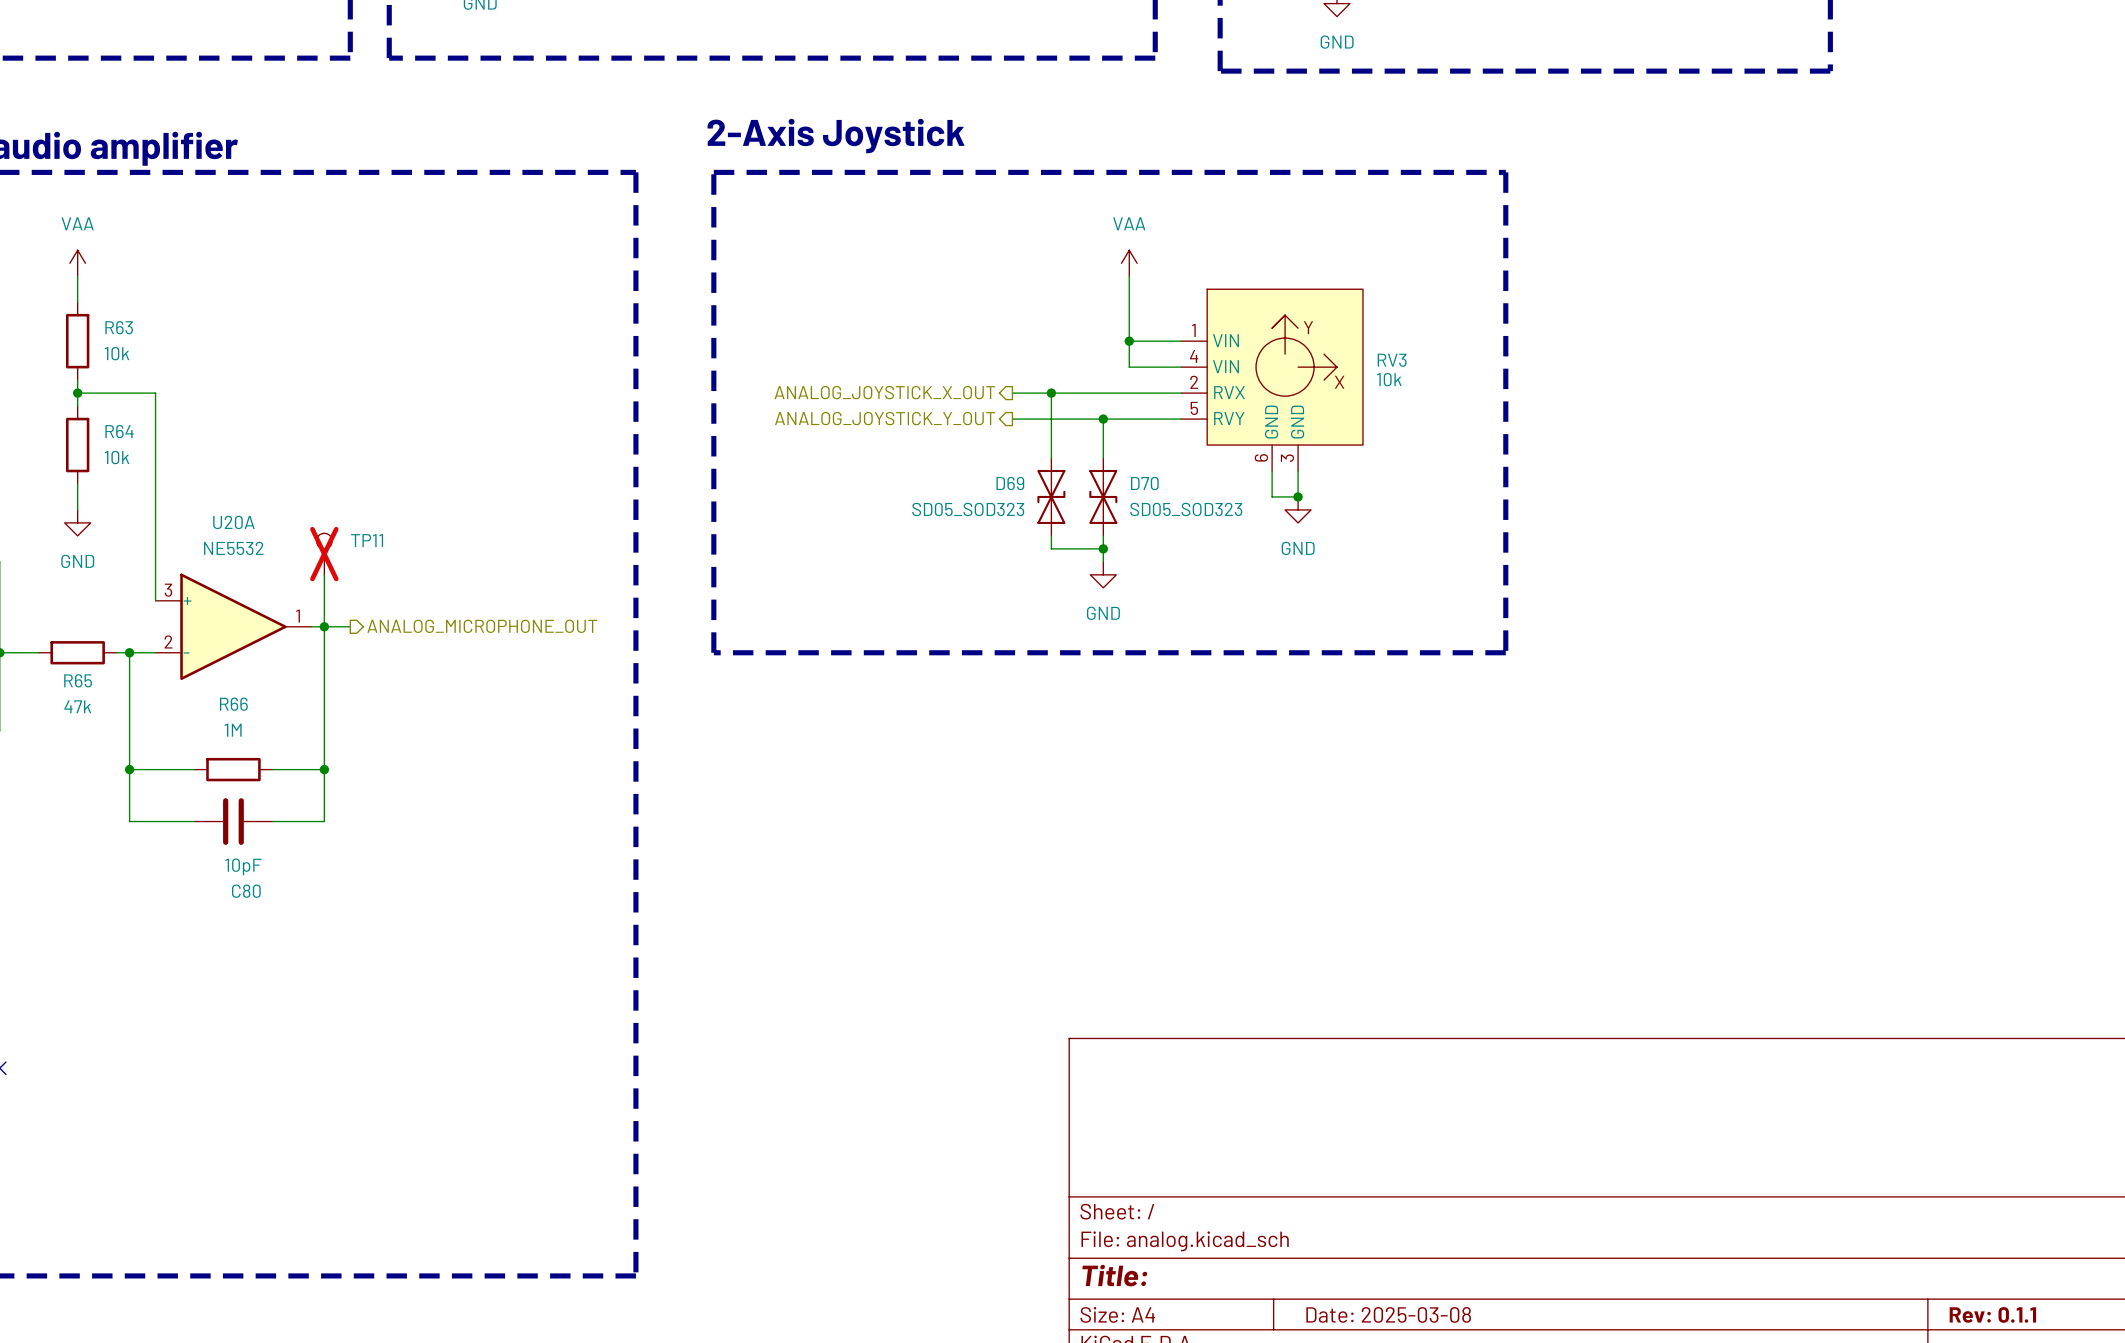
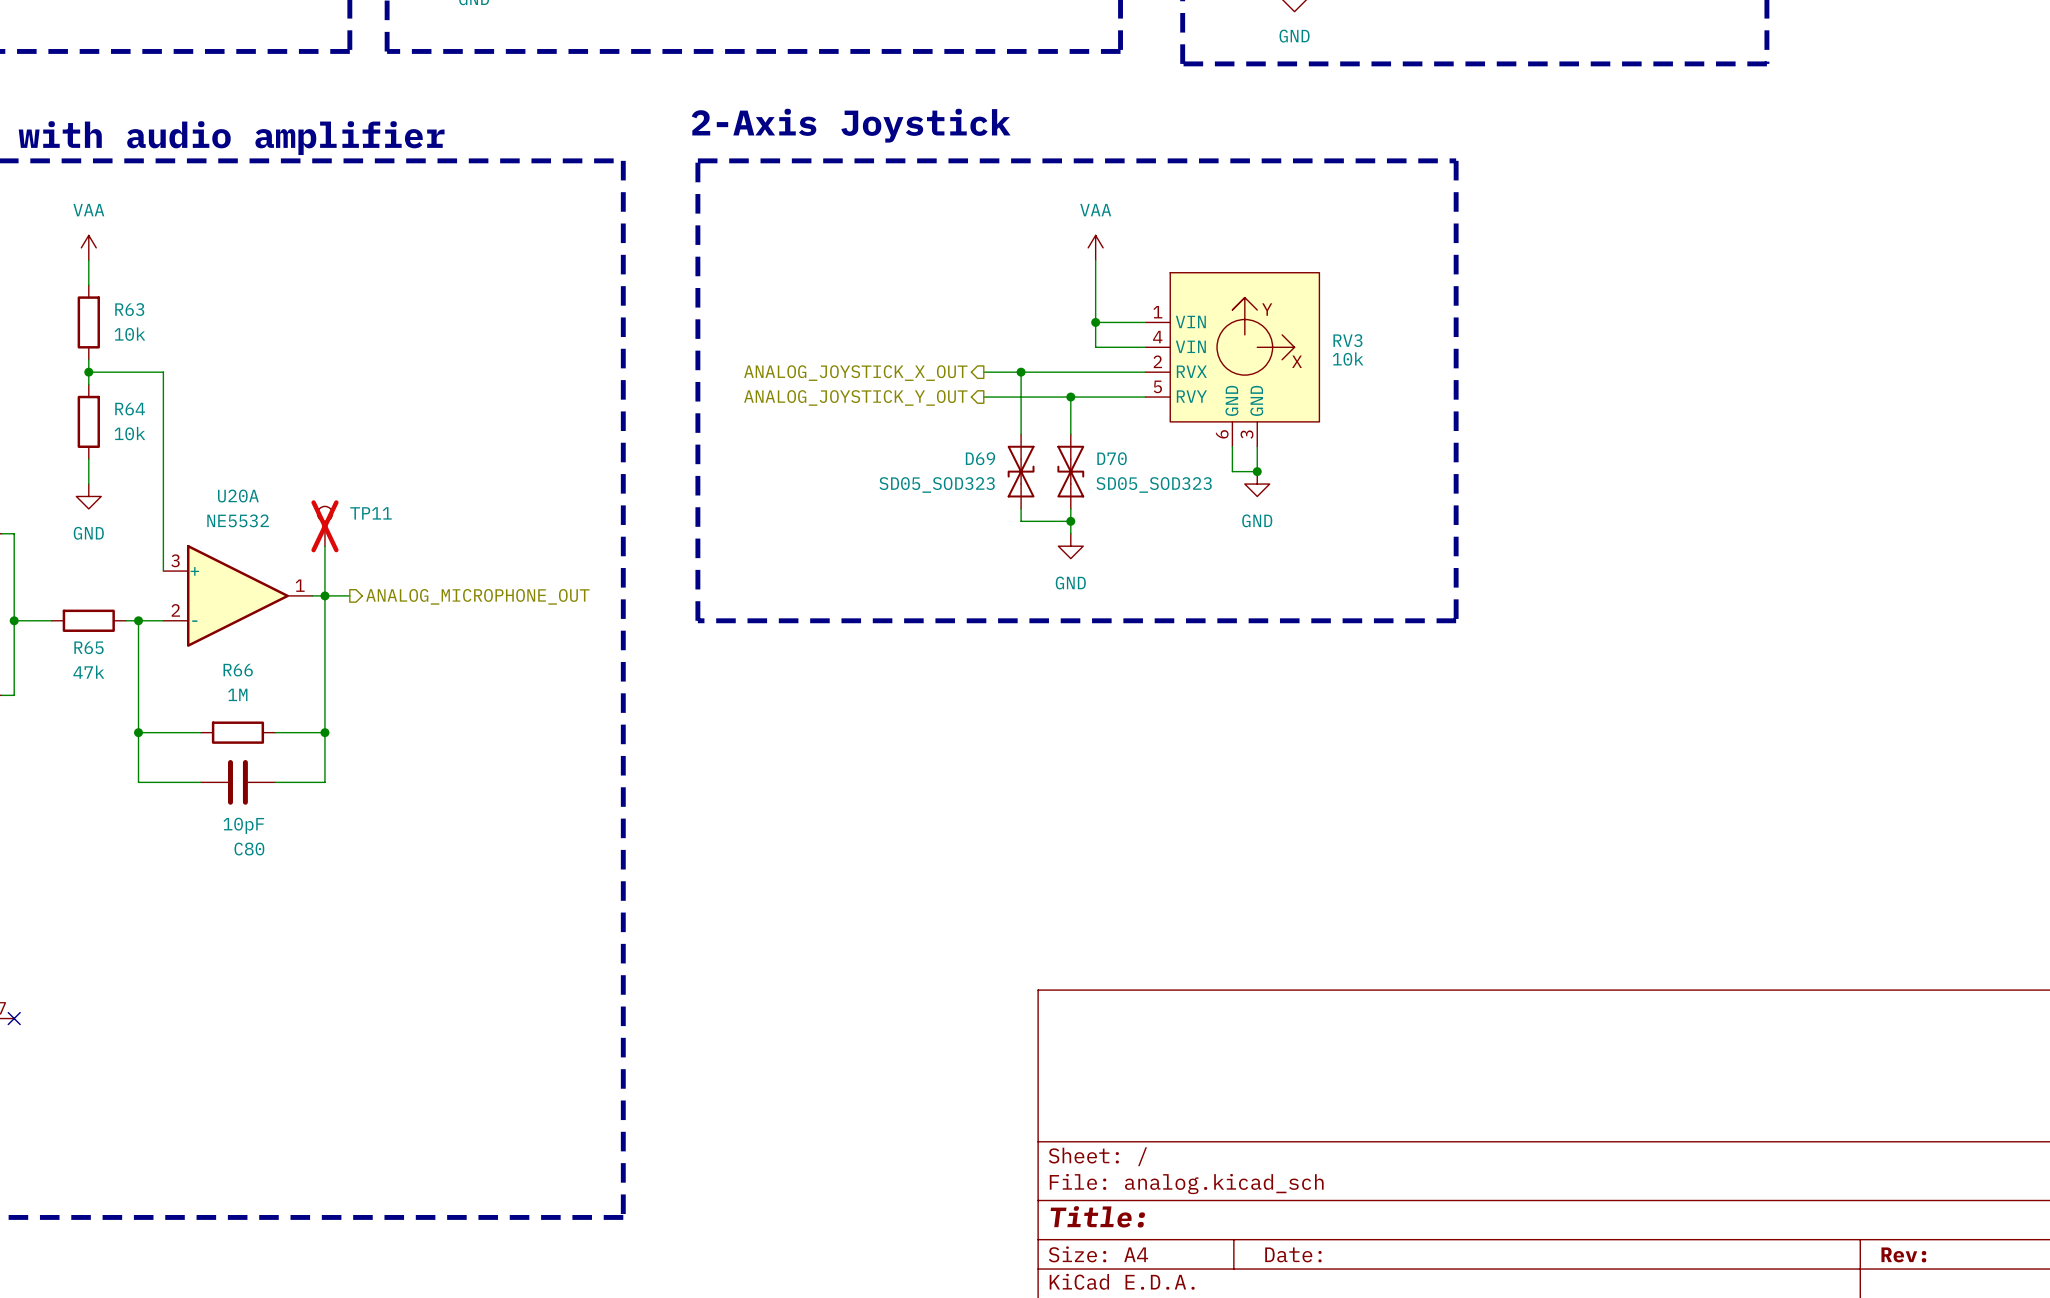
title block: Date: 2025-03-08 (1388, 1314) -> Date: (1293, 1254)
title block: Rev: 0.1.1 (1992, 1314) -> Rev: (1903, 1254)

